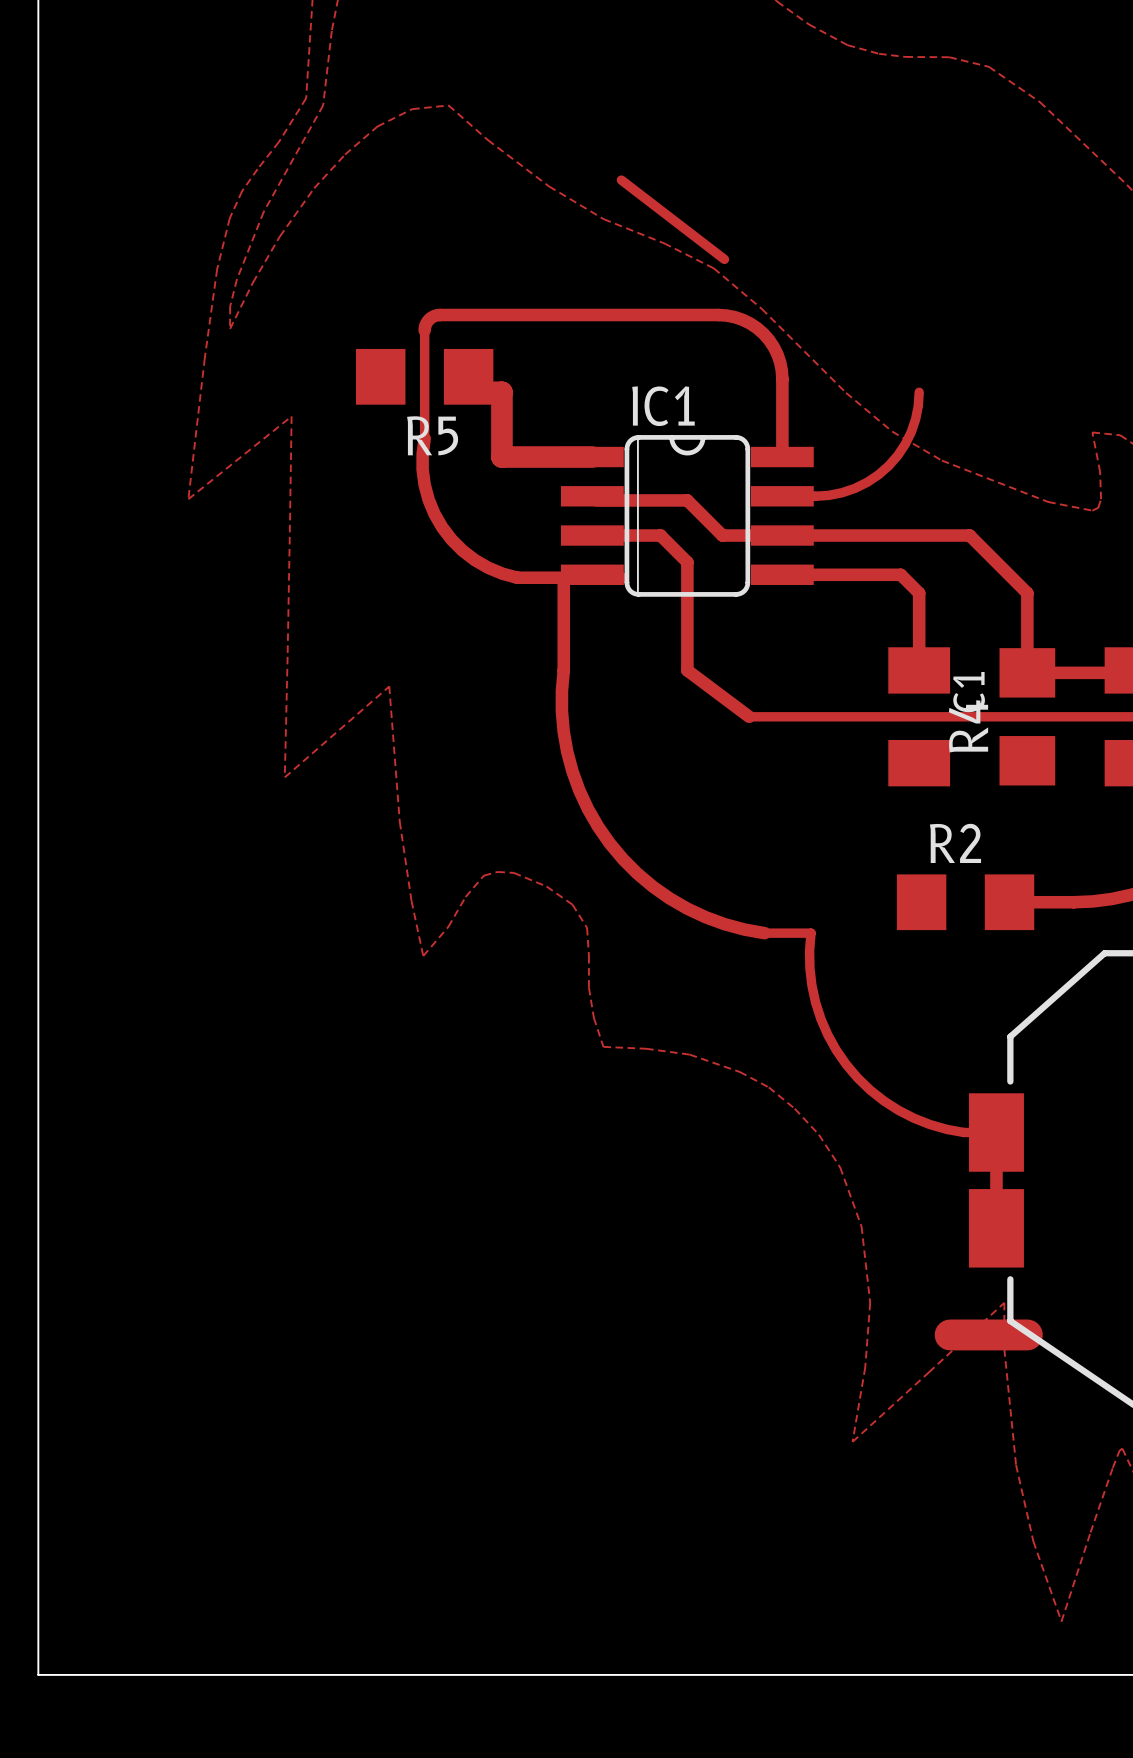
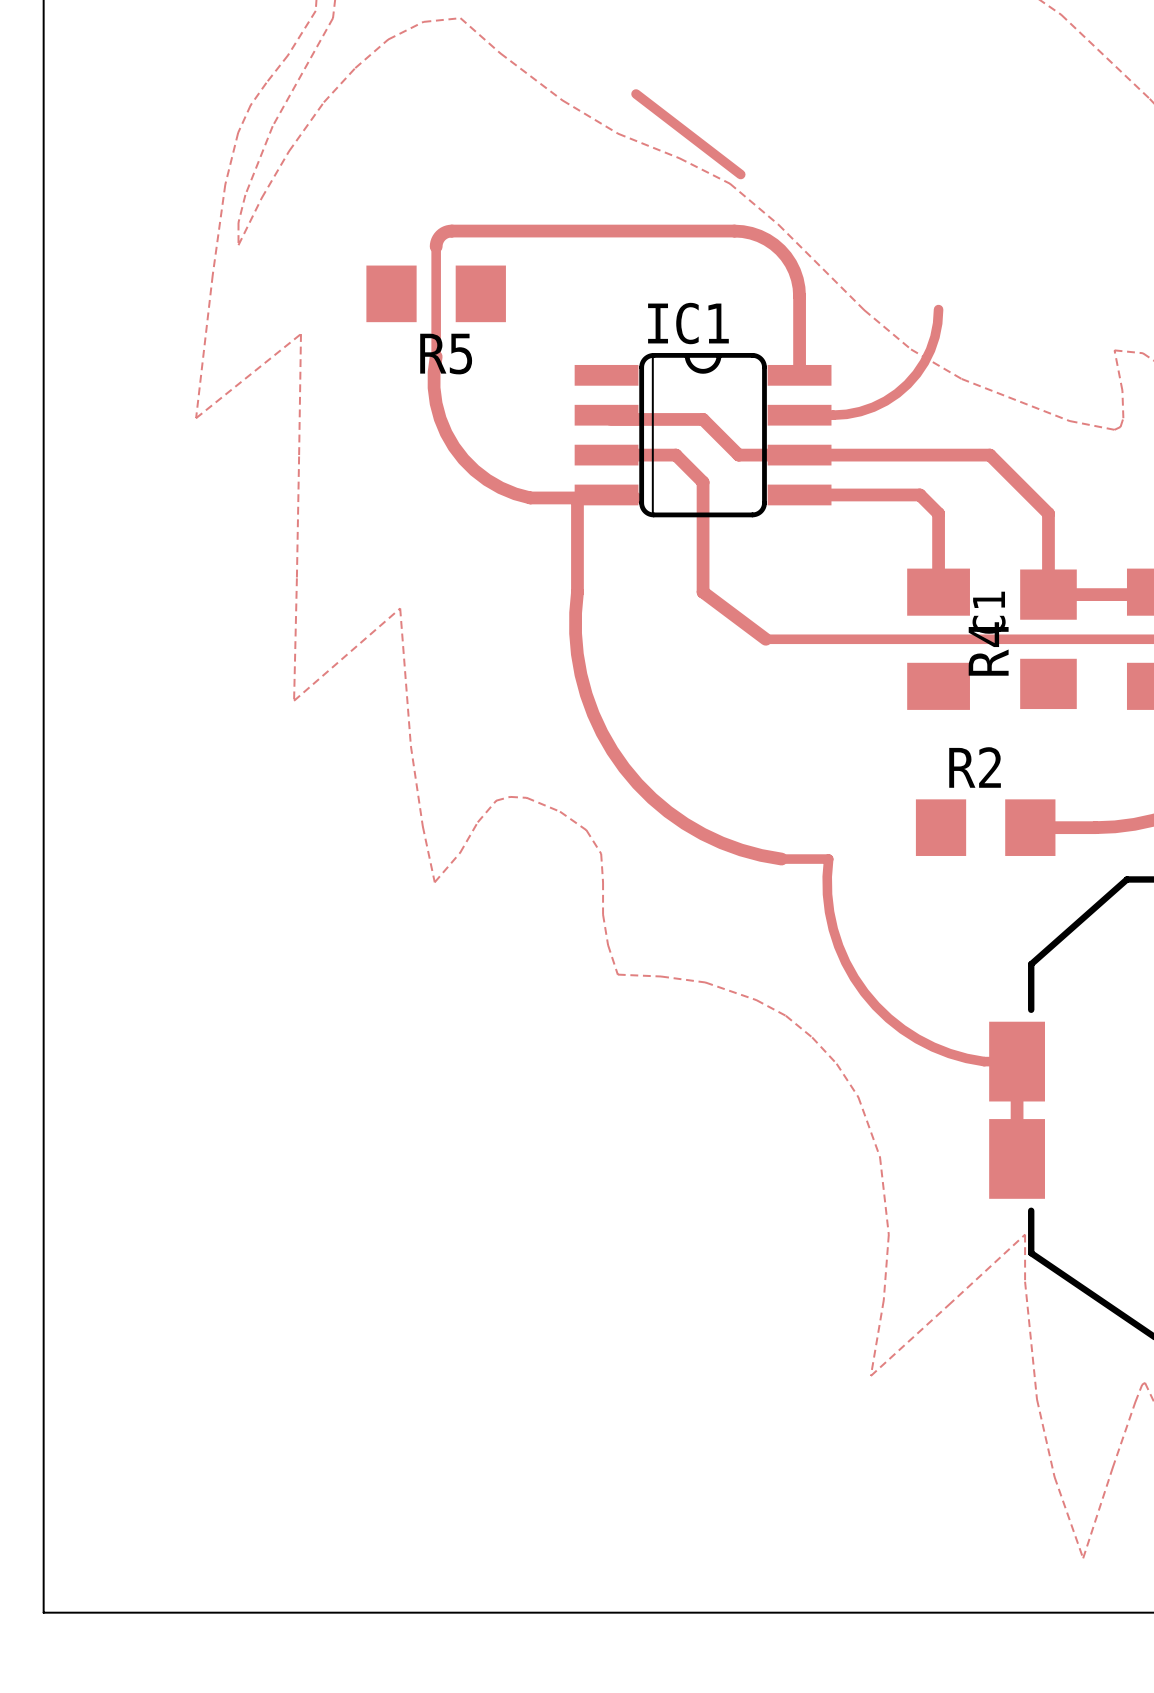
track: (468, 376) (468, 392) (501, 392) (501, 457) (592, 457) -> none
track: (950, 1334) (1027, 1334) -> none

